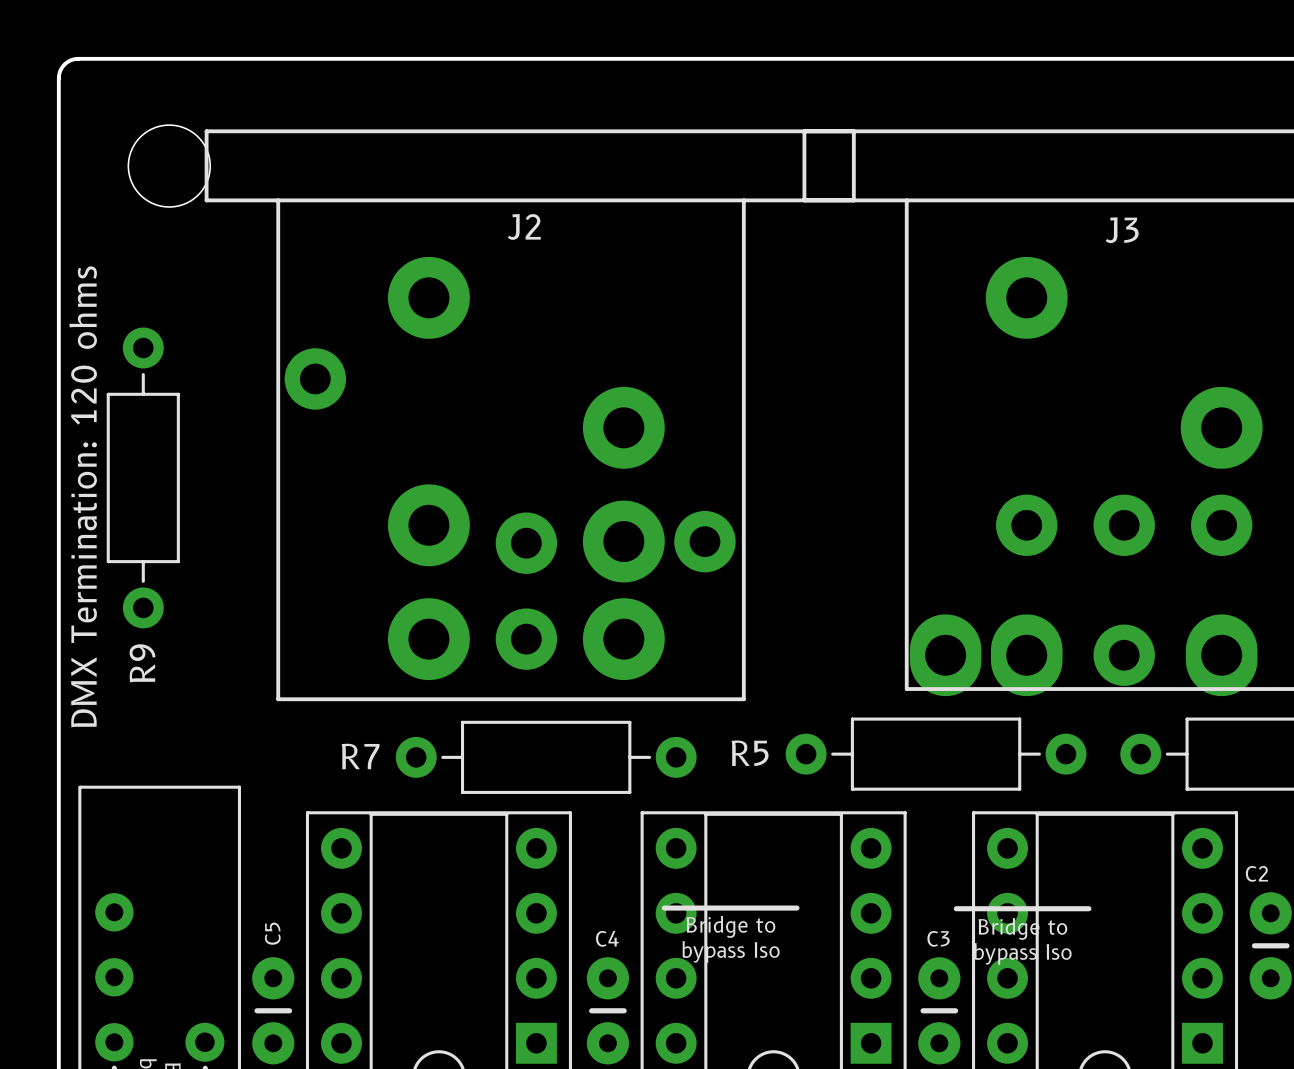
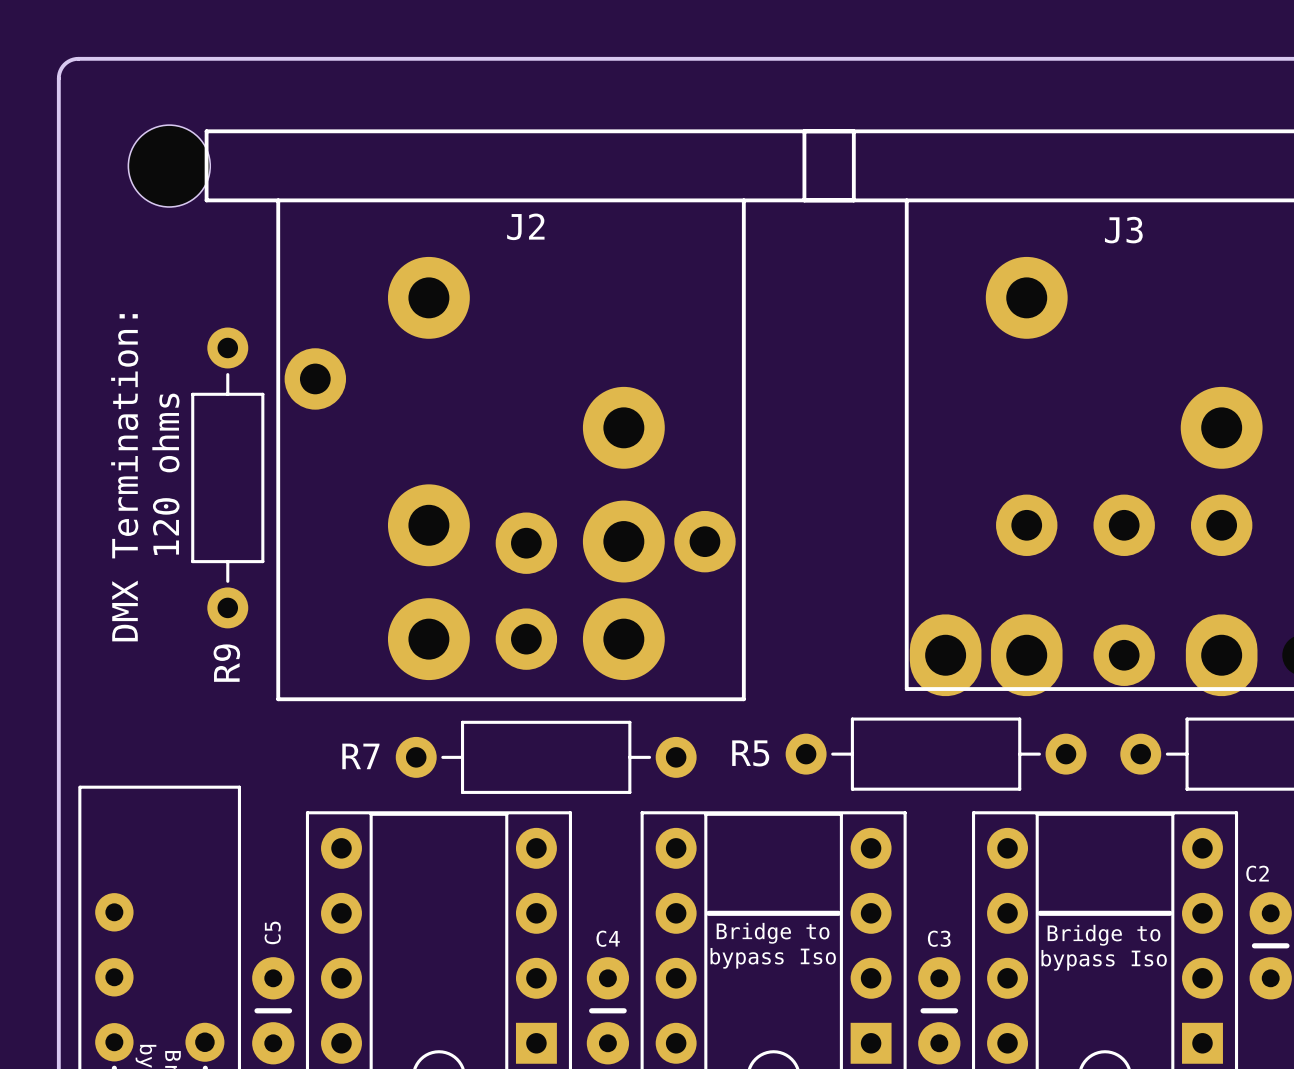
text: none -> 120 ohms (165, 474)
R9 position: (143, 477) -> (227, 477)
text: DMX Termination: 120 ohms (83, 496) -> DMX Termination: (124, 477)
line: (664, 908) (796, 908) -> none
line: (956, 908) (1088, 908) -> none
line: none -> (708, 913) (838, 913)
line: none -> (1040, 913) (1170, 913)
text position: Bridge to (730, 926) -> Bridge to (773, 933)
text position: Bridge to (1022, 928) -> Bridge to (1104, 935)
text position: bypass Iso (731, 951) -> bypass Iso (773, 958)
text position: bypass Iso (1023, 953) -> bypass Iso (1104, 960)

